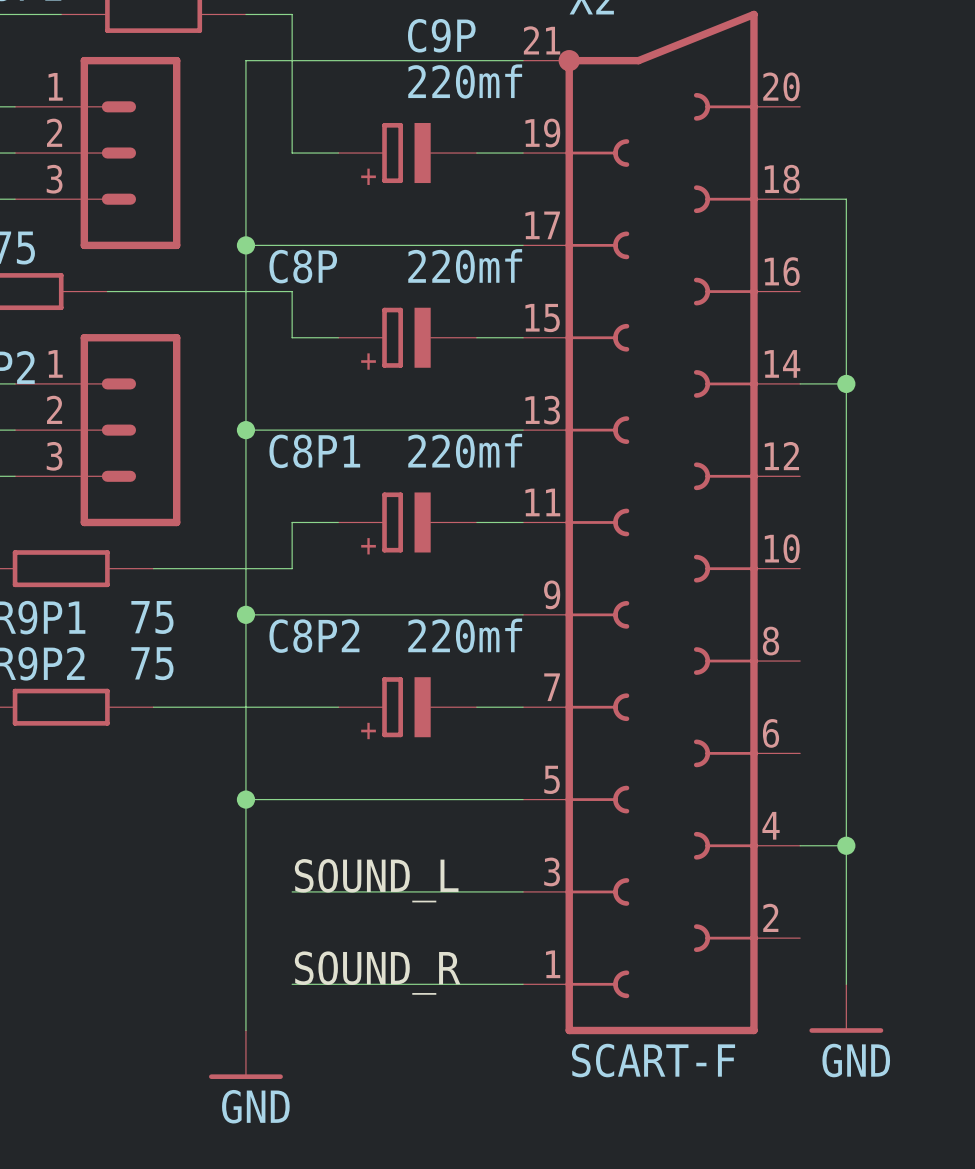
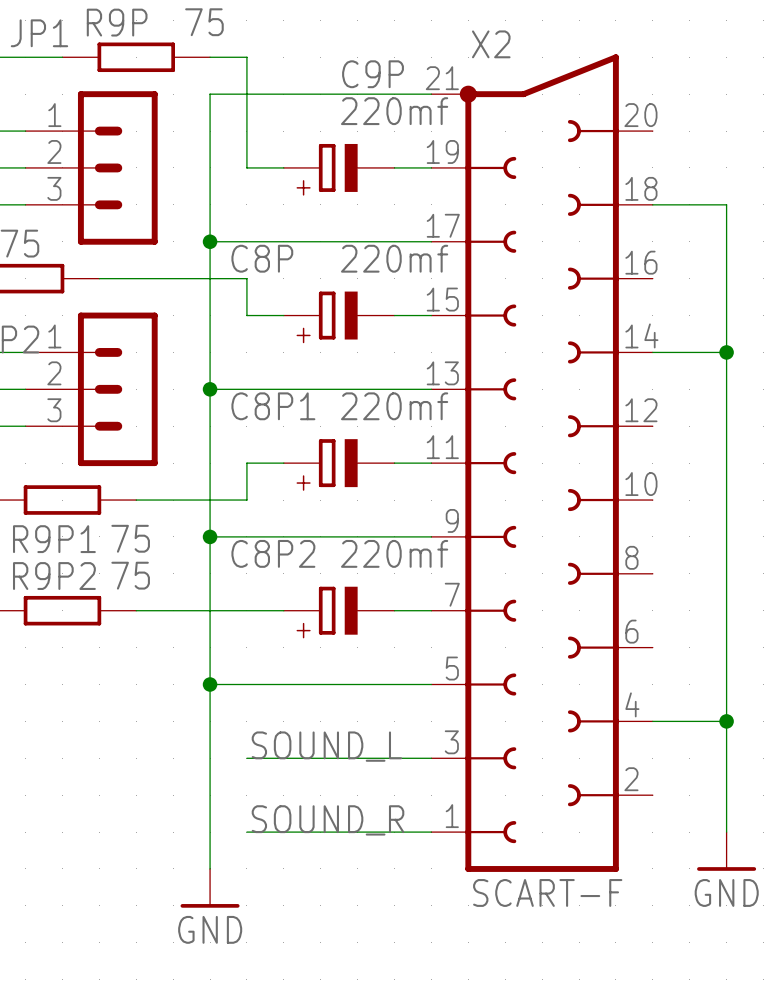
wire: (846, 199) (846, 984) -> (689, 204) (726, 204) (726, 832)
wire: none -> (689, 352) (726, 352)
junction position: (846, 383) -> (726, 352)
wire: none -> (689, 721) (726, 721)
junction position: (846, 845) -> (726, 721)
power symbol position: GND (846, 1008) -> GND (726, 851)

